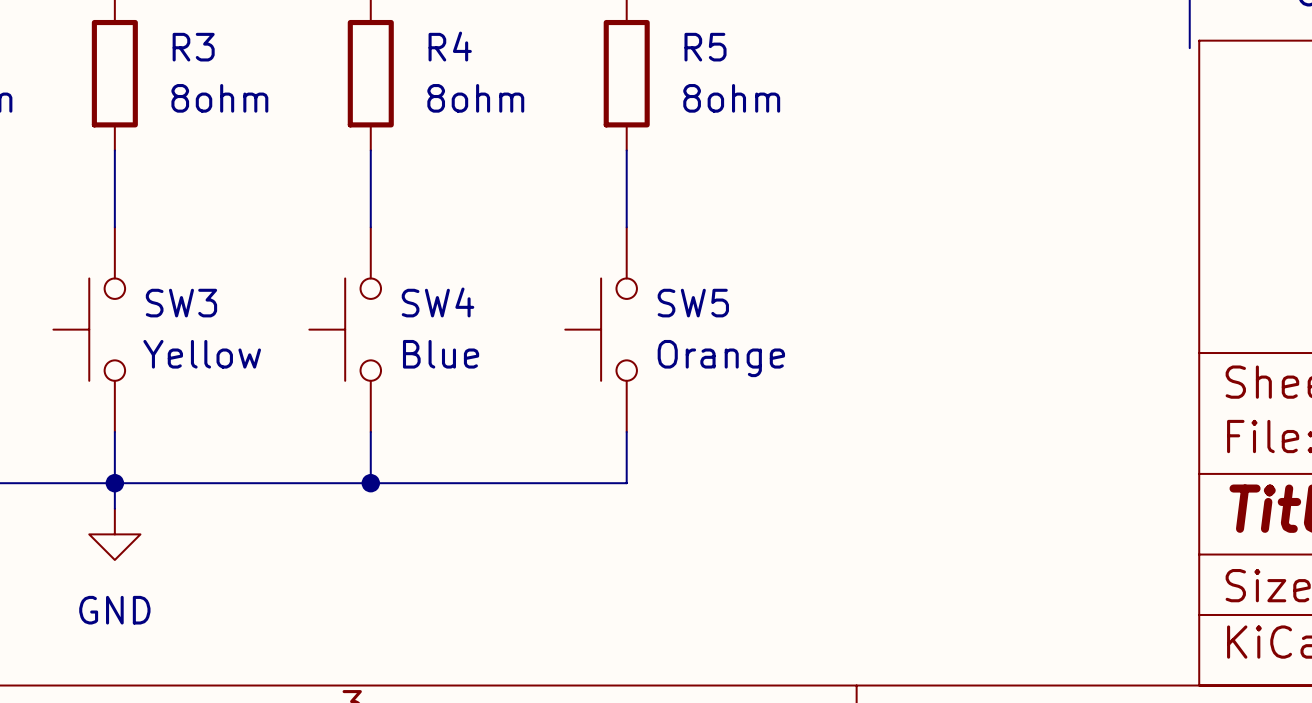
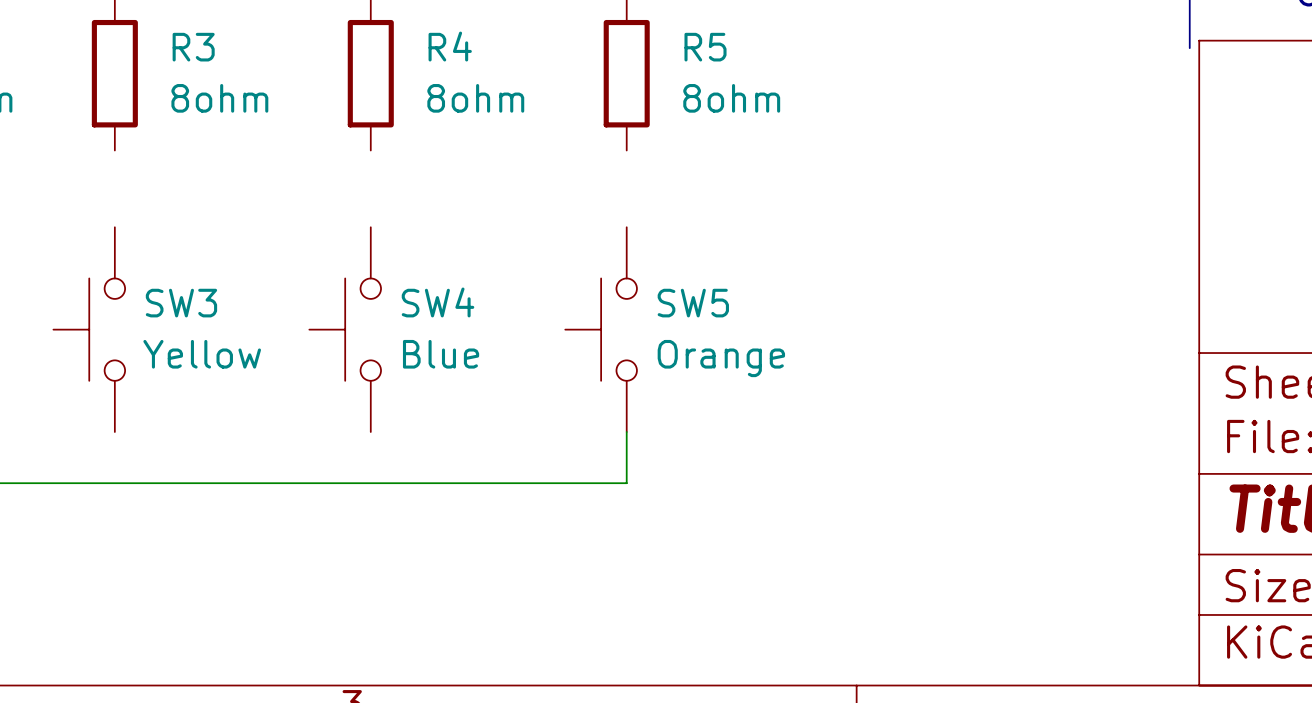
wire: (114, 150) (114, 227) -> none
wire: (370, 150) (370, 227) -> none
wire: (626, 150) (626, 227) -> none
wire: (114, 432) (114, 508) -> none
wire: (370, 432) (370, 483) -> none
junction: (114, 483) -> none
junction: (370, 483) -> none
power symbol: GND (114, 534) -> none

